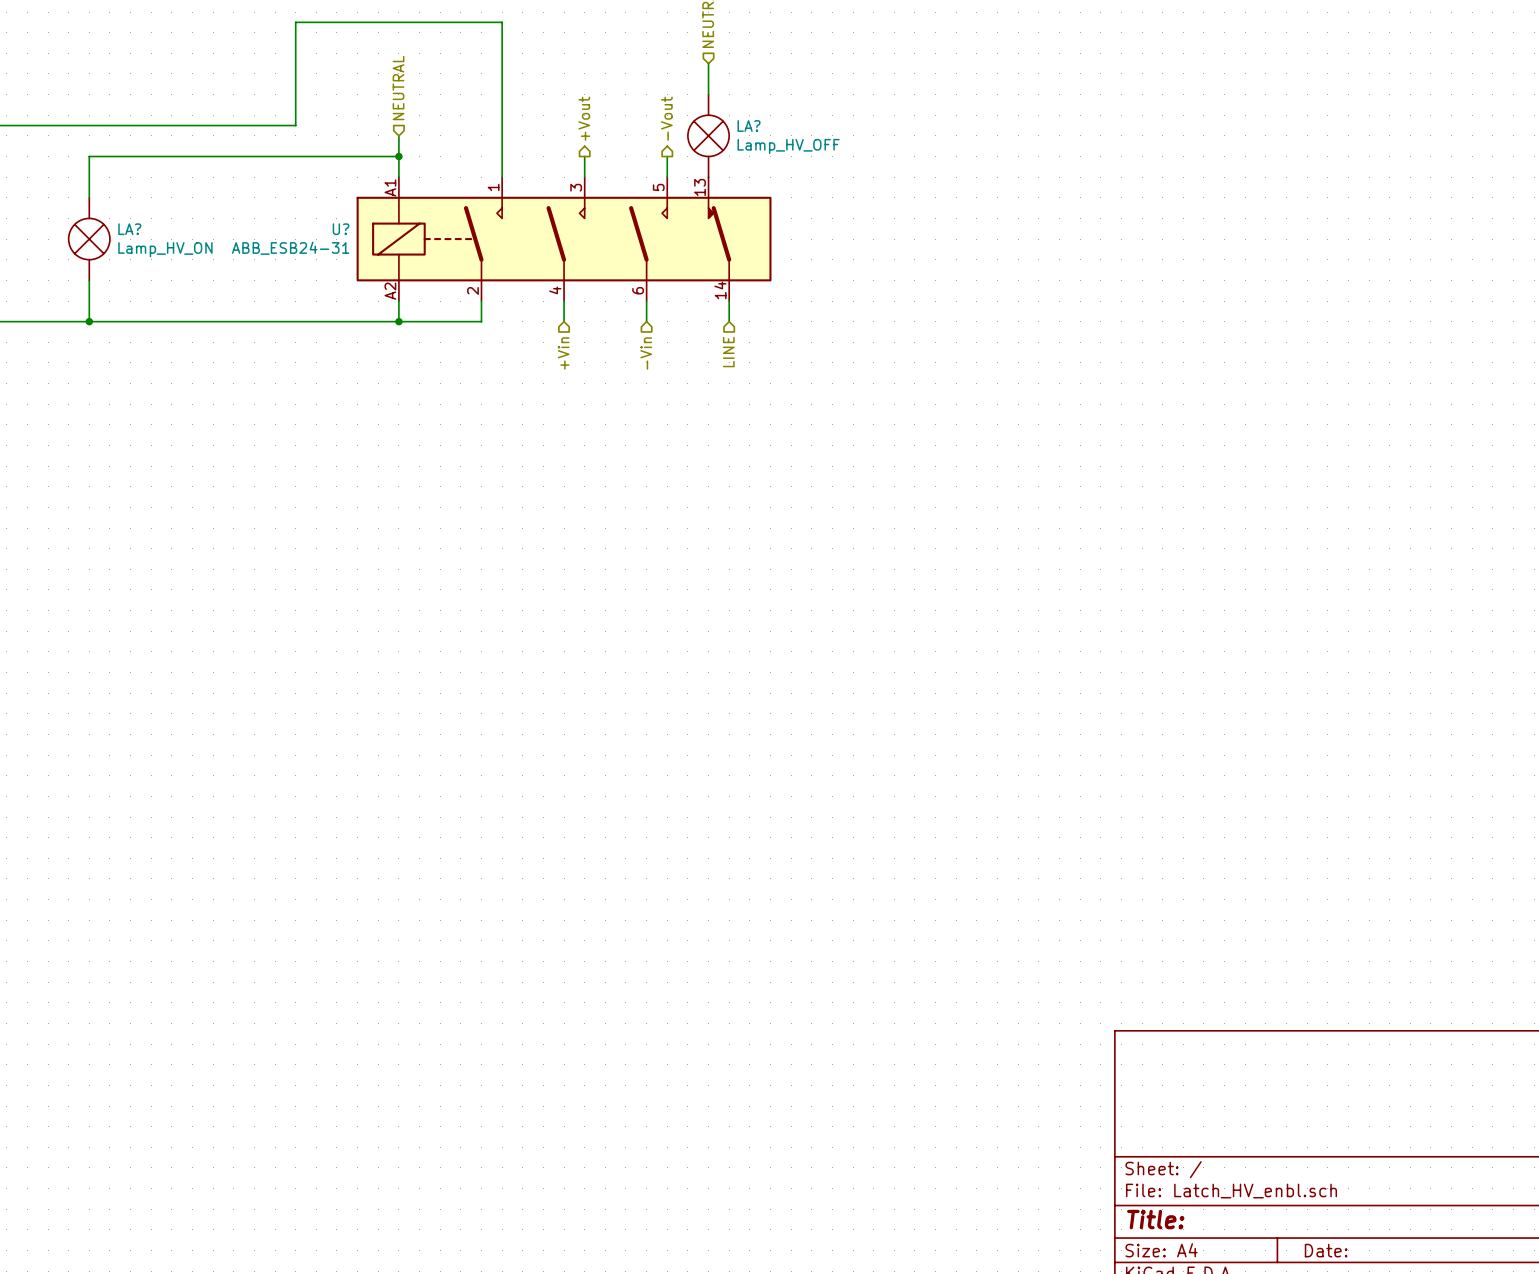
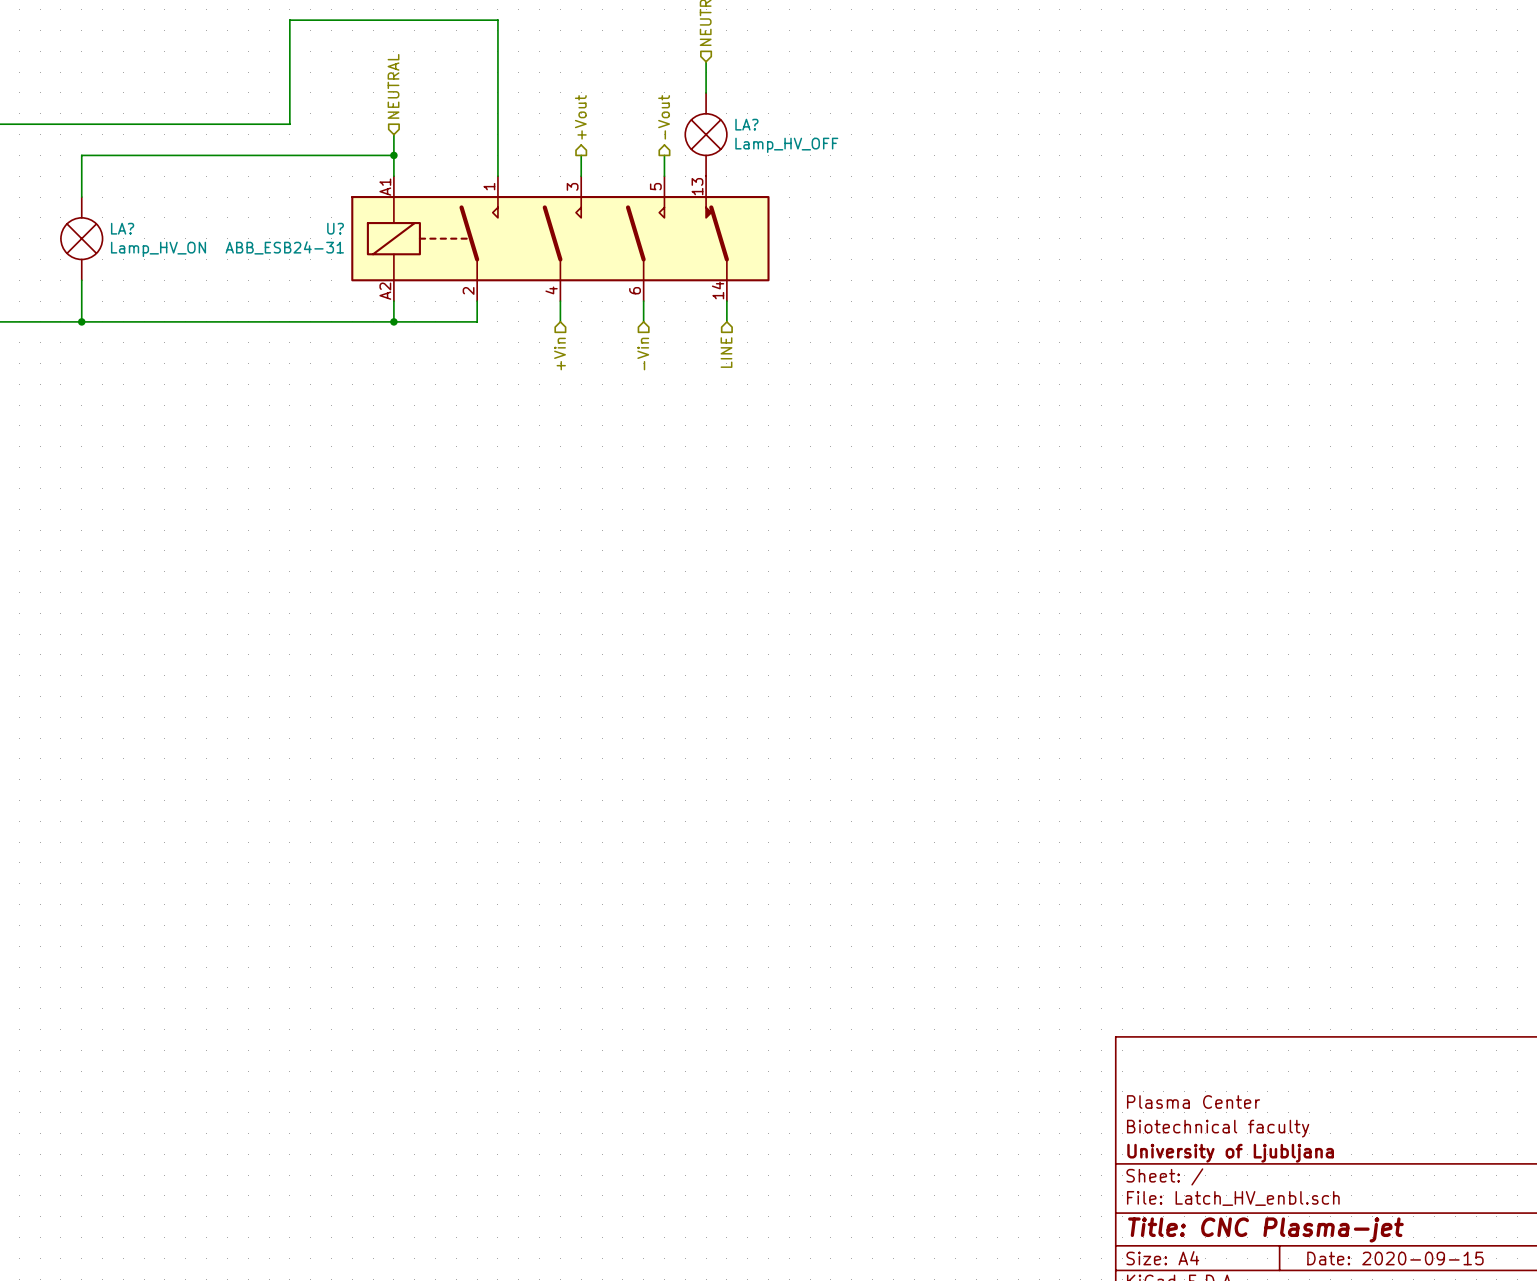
title block: none -> Plasma Center (1193, 1102)
title block: none -> Biotechnical faculty (1218, 1128)
title block: none -> University of Ljubljana (1230, 1153)
title block: Title: (1155, 1219) -> Title: CNC Plasma-jet (1265, 1229)
title block: Date: (1326, 1250) -> Date: 2020-09-15 (1395, 1258)

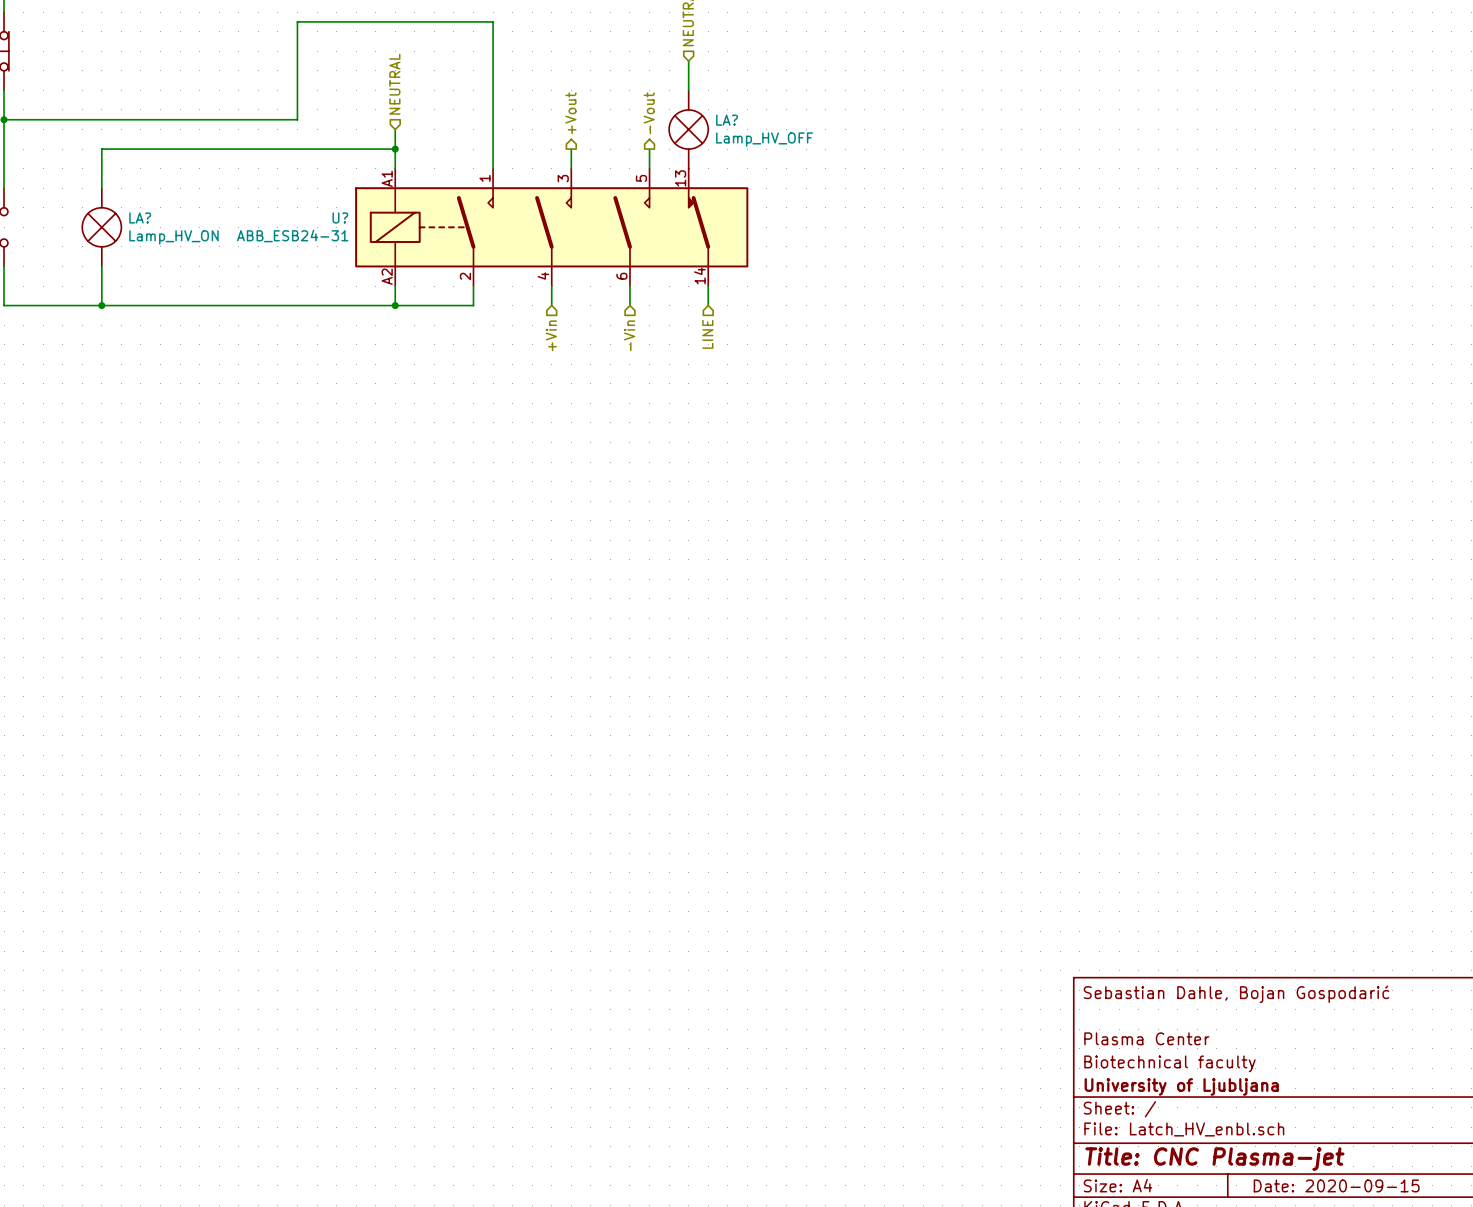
title block: none -> Sebastian Dahle, Bojan Gospodarić (1236, 994)

